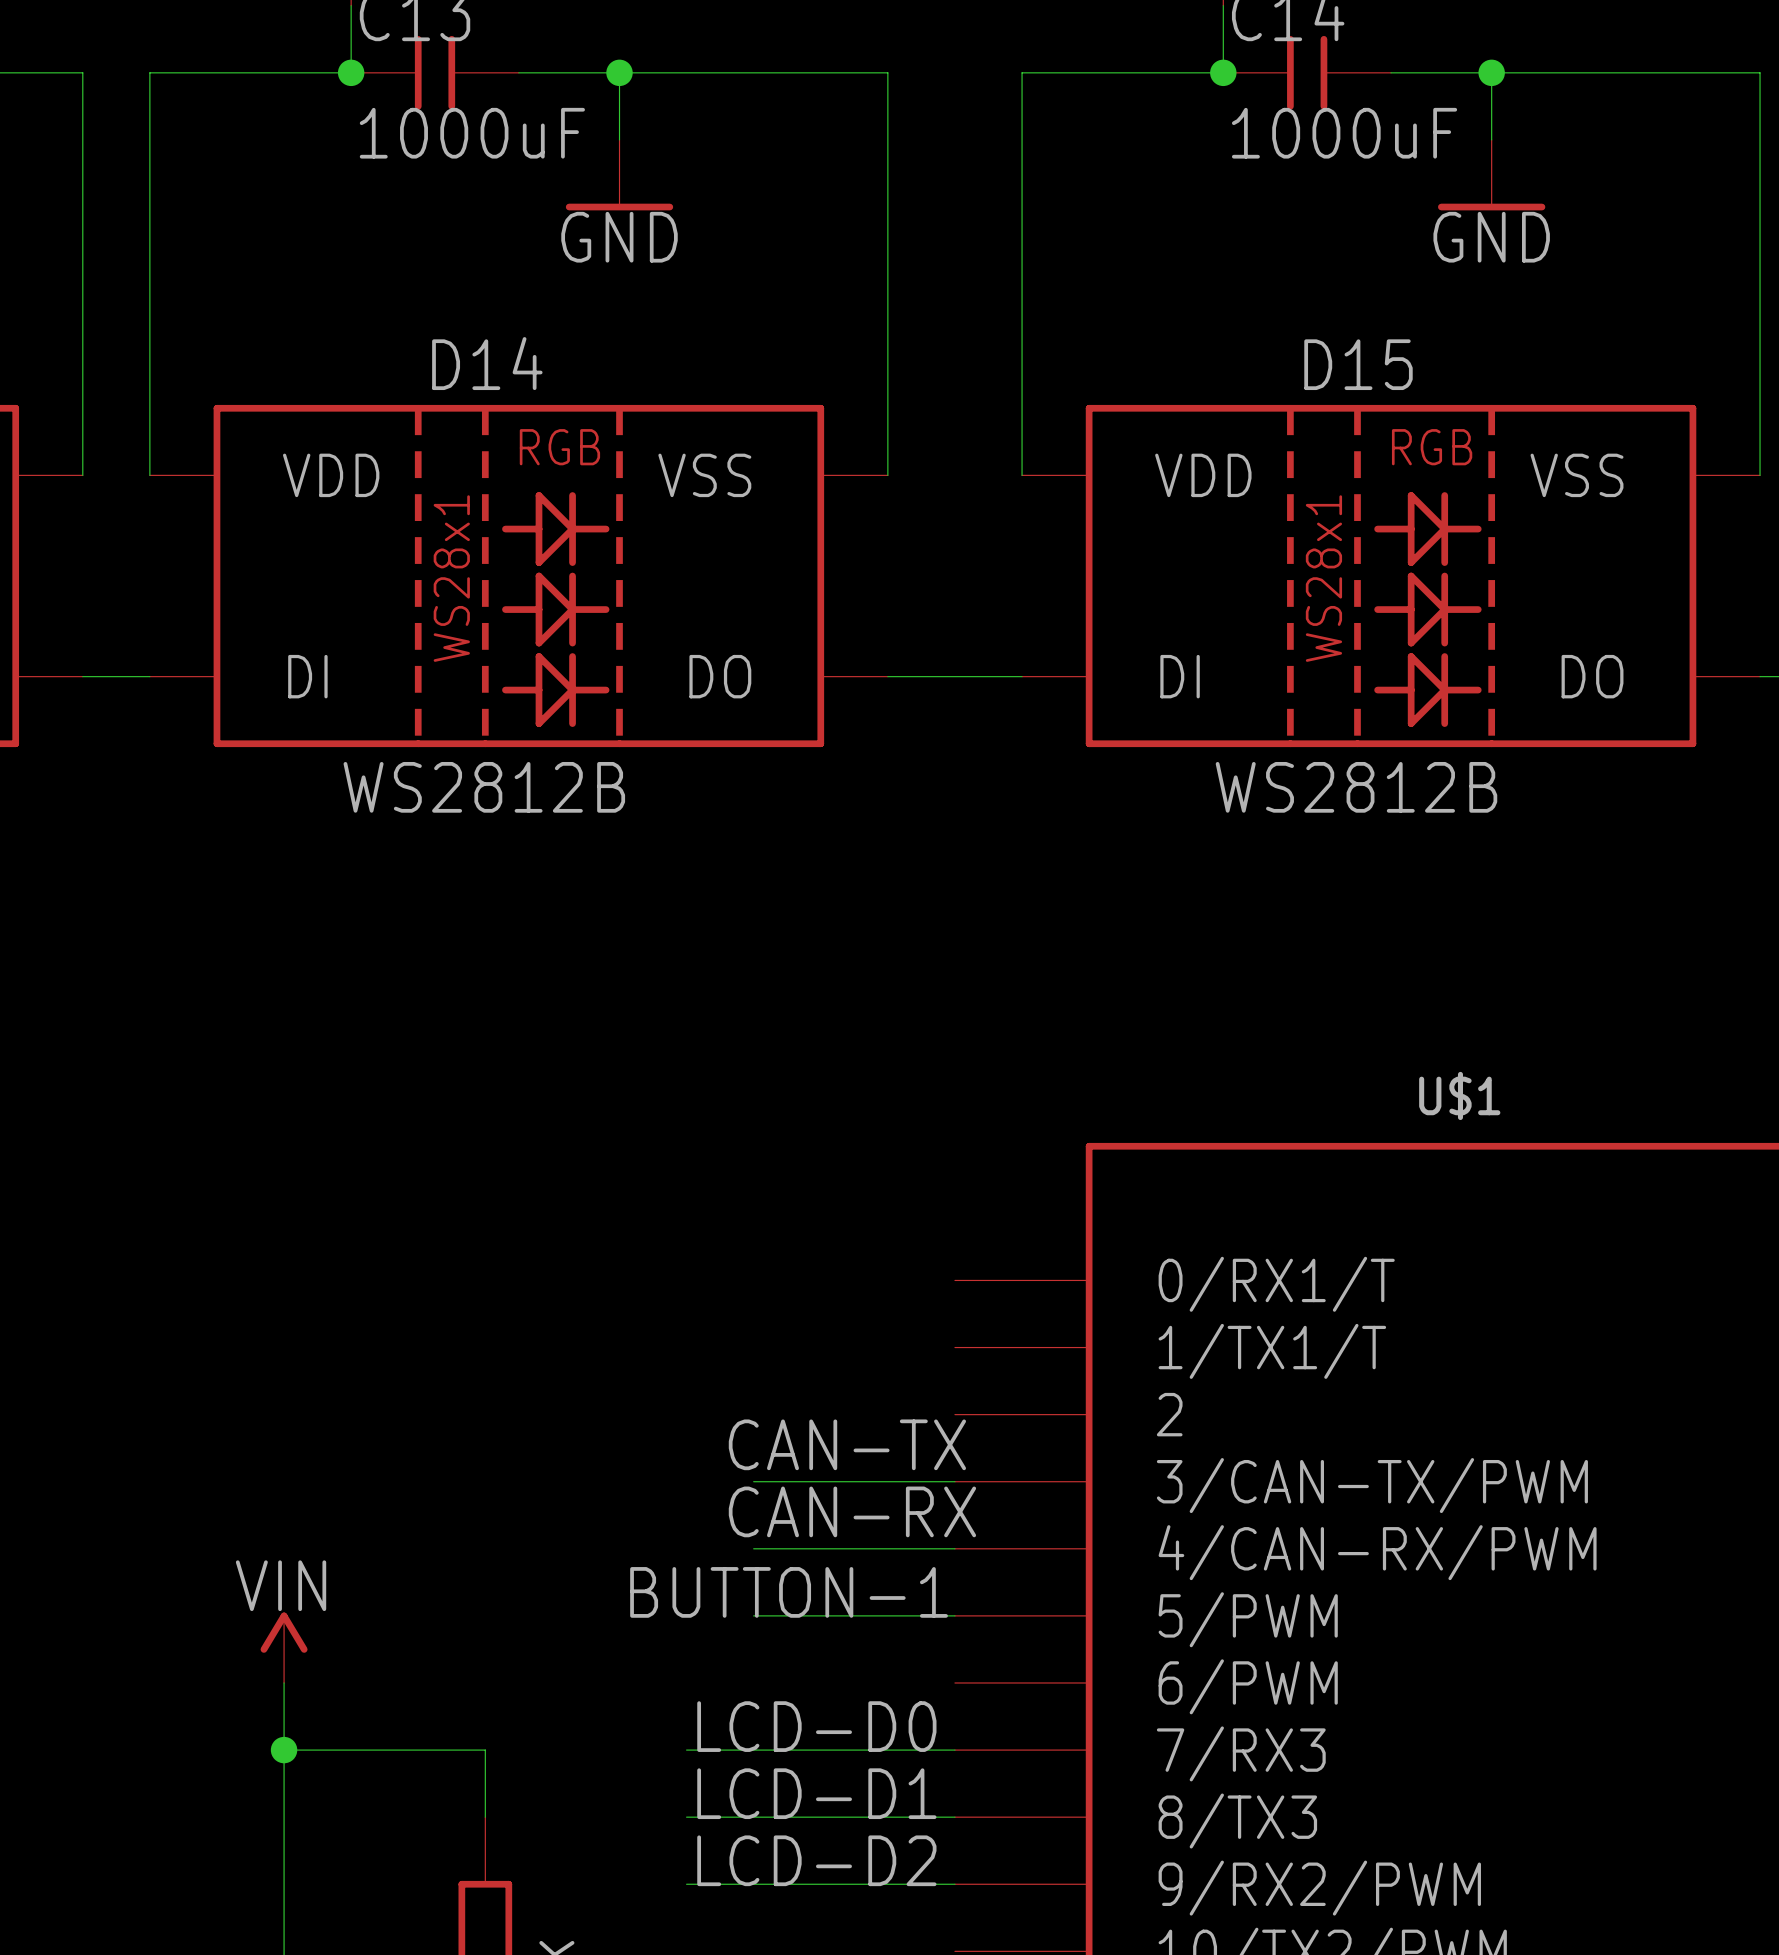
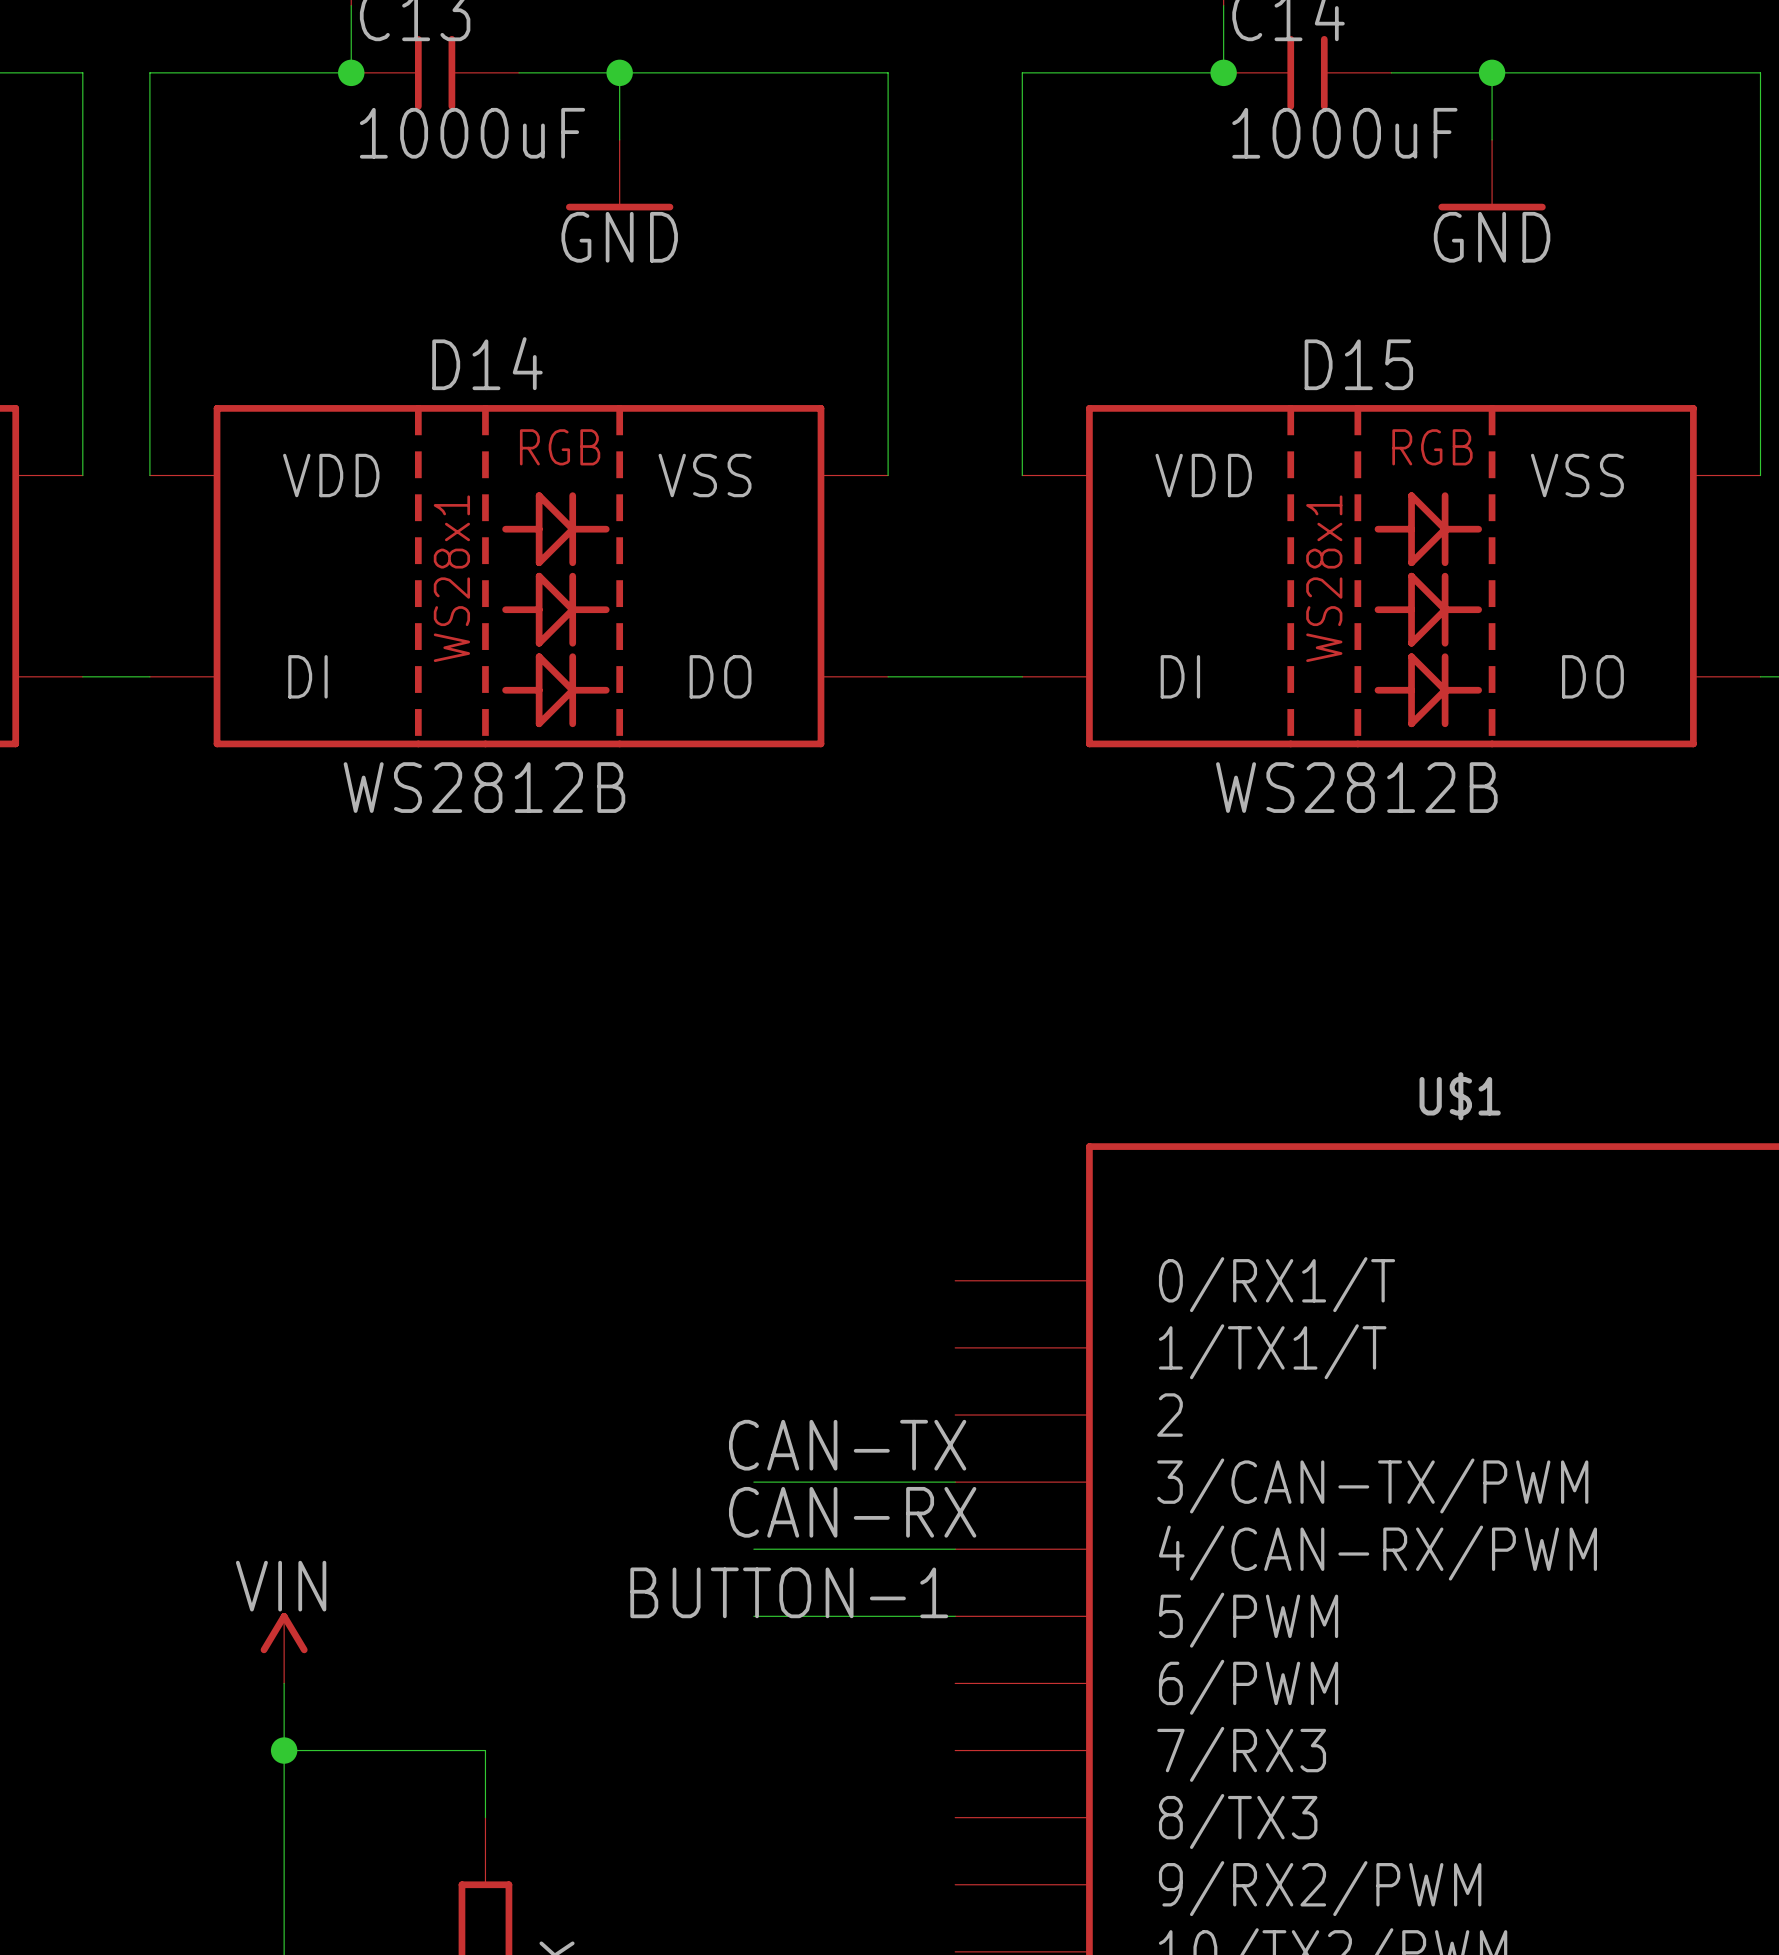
label: LCD-D0 (816, 1726) -> none
wire: (686, 1750) (954, 1750) -> none
label: LCD-D1 (816, 1793) -> none
wire: (686, 1817) (954, 1817) -> none
label: LCD-D2 (816, 1860) -> none
wire: (686, 1884) (954, 1884) -> none

